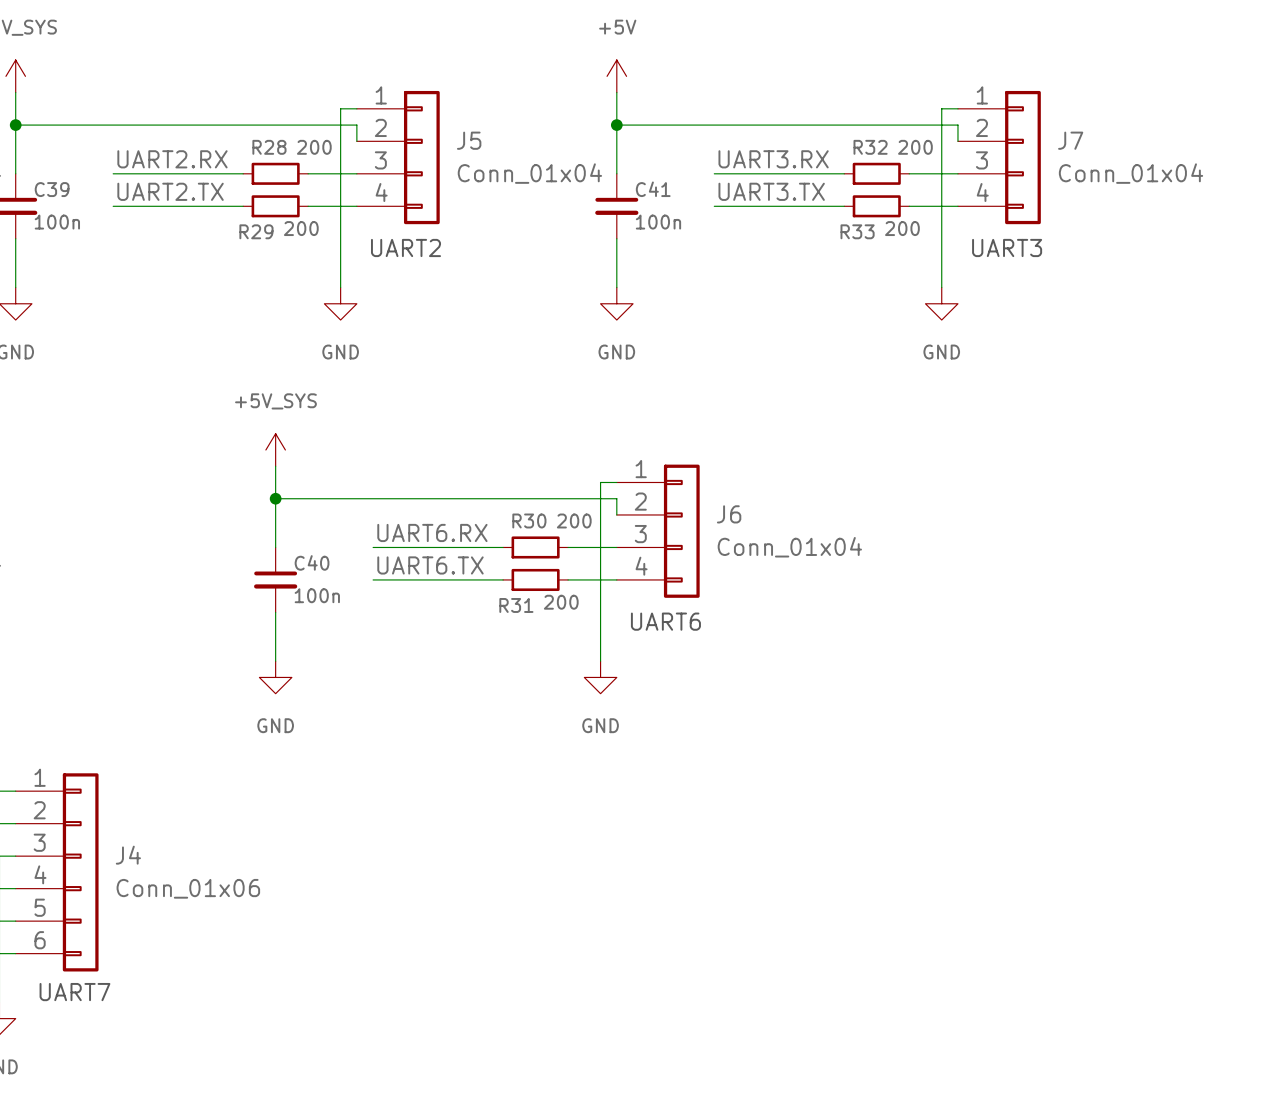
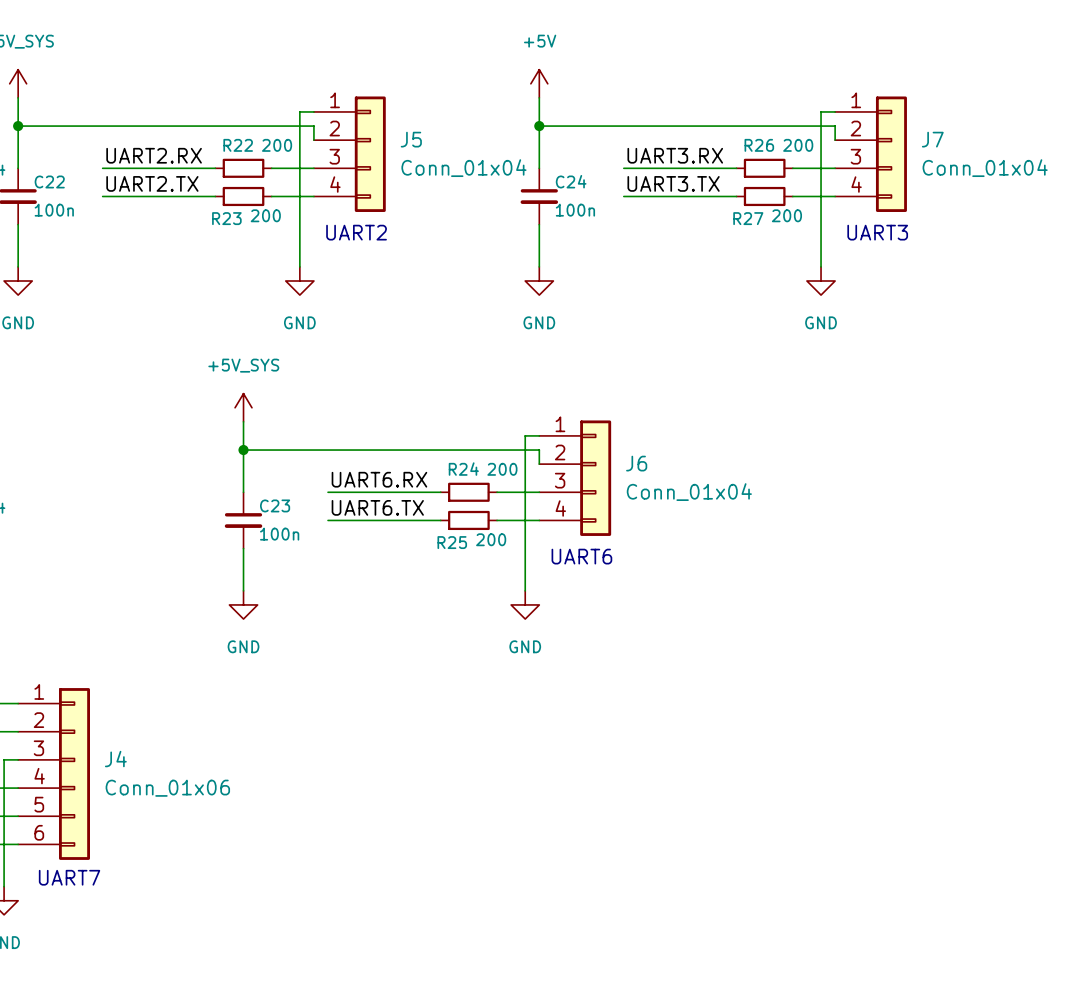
R28 name: R28 (269, 147) -> R22 (238, 145)
R32 name: R32 (870, 147) -> R26 (759, 145)
C39 name: C39 (52, 189) -> C22 (49, 181)
C41 name: C41 (653, 189) -> C24 (571, 181)
R29 name: R29 (256, 231) -> R23 (226, 218)
R33 name: R33 (857, 231) -> R27 (748, 218)
R30 name: R30 (529, 520) -> R24 (463, 469)
C40 name: C40 (312, 562) -> C23 (275, 505)
R31 name: R31 (516, 605) -> R25 (452, 542)

